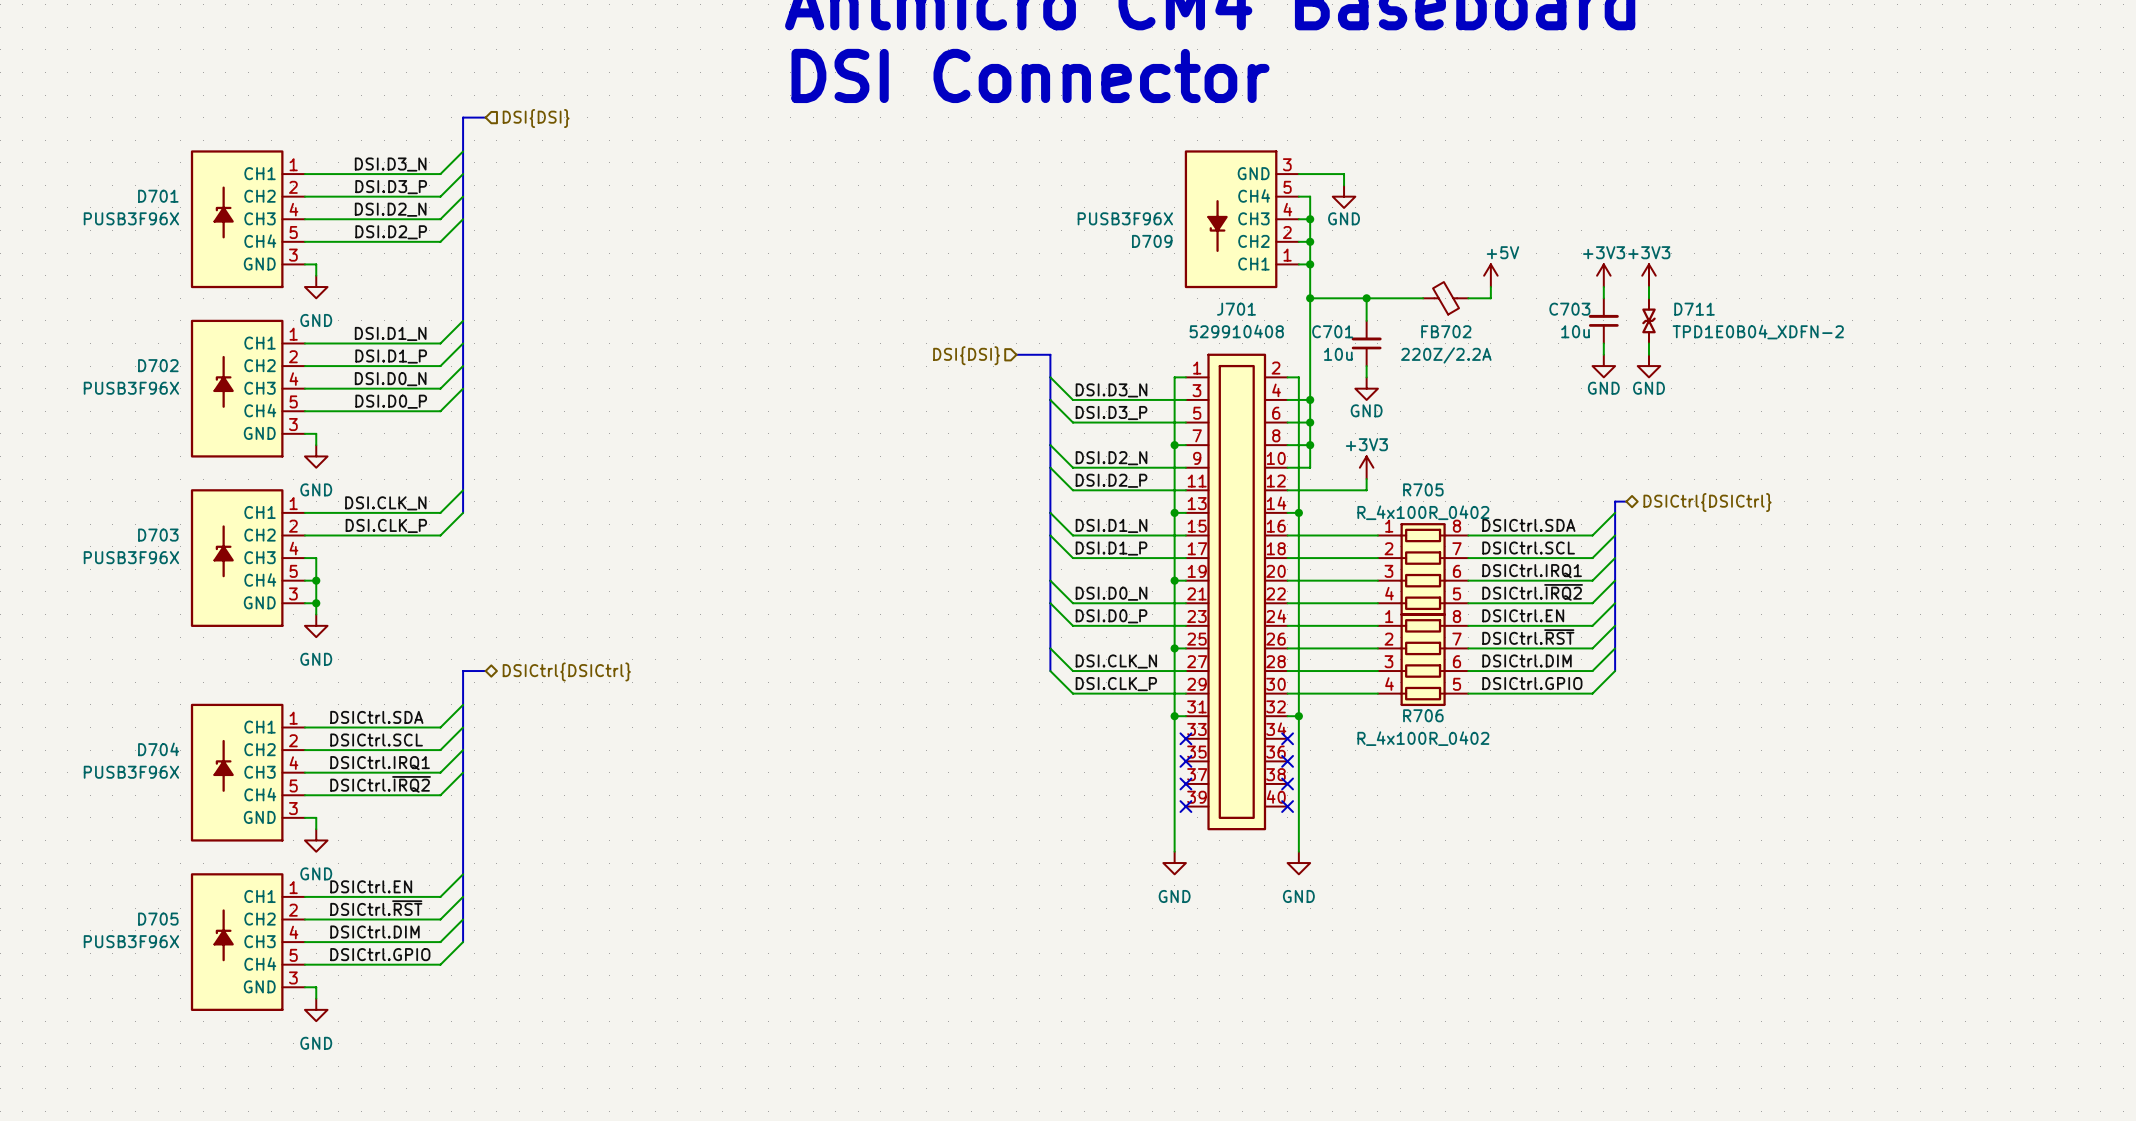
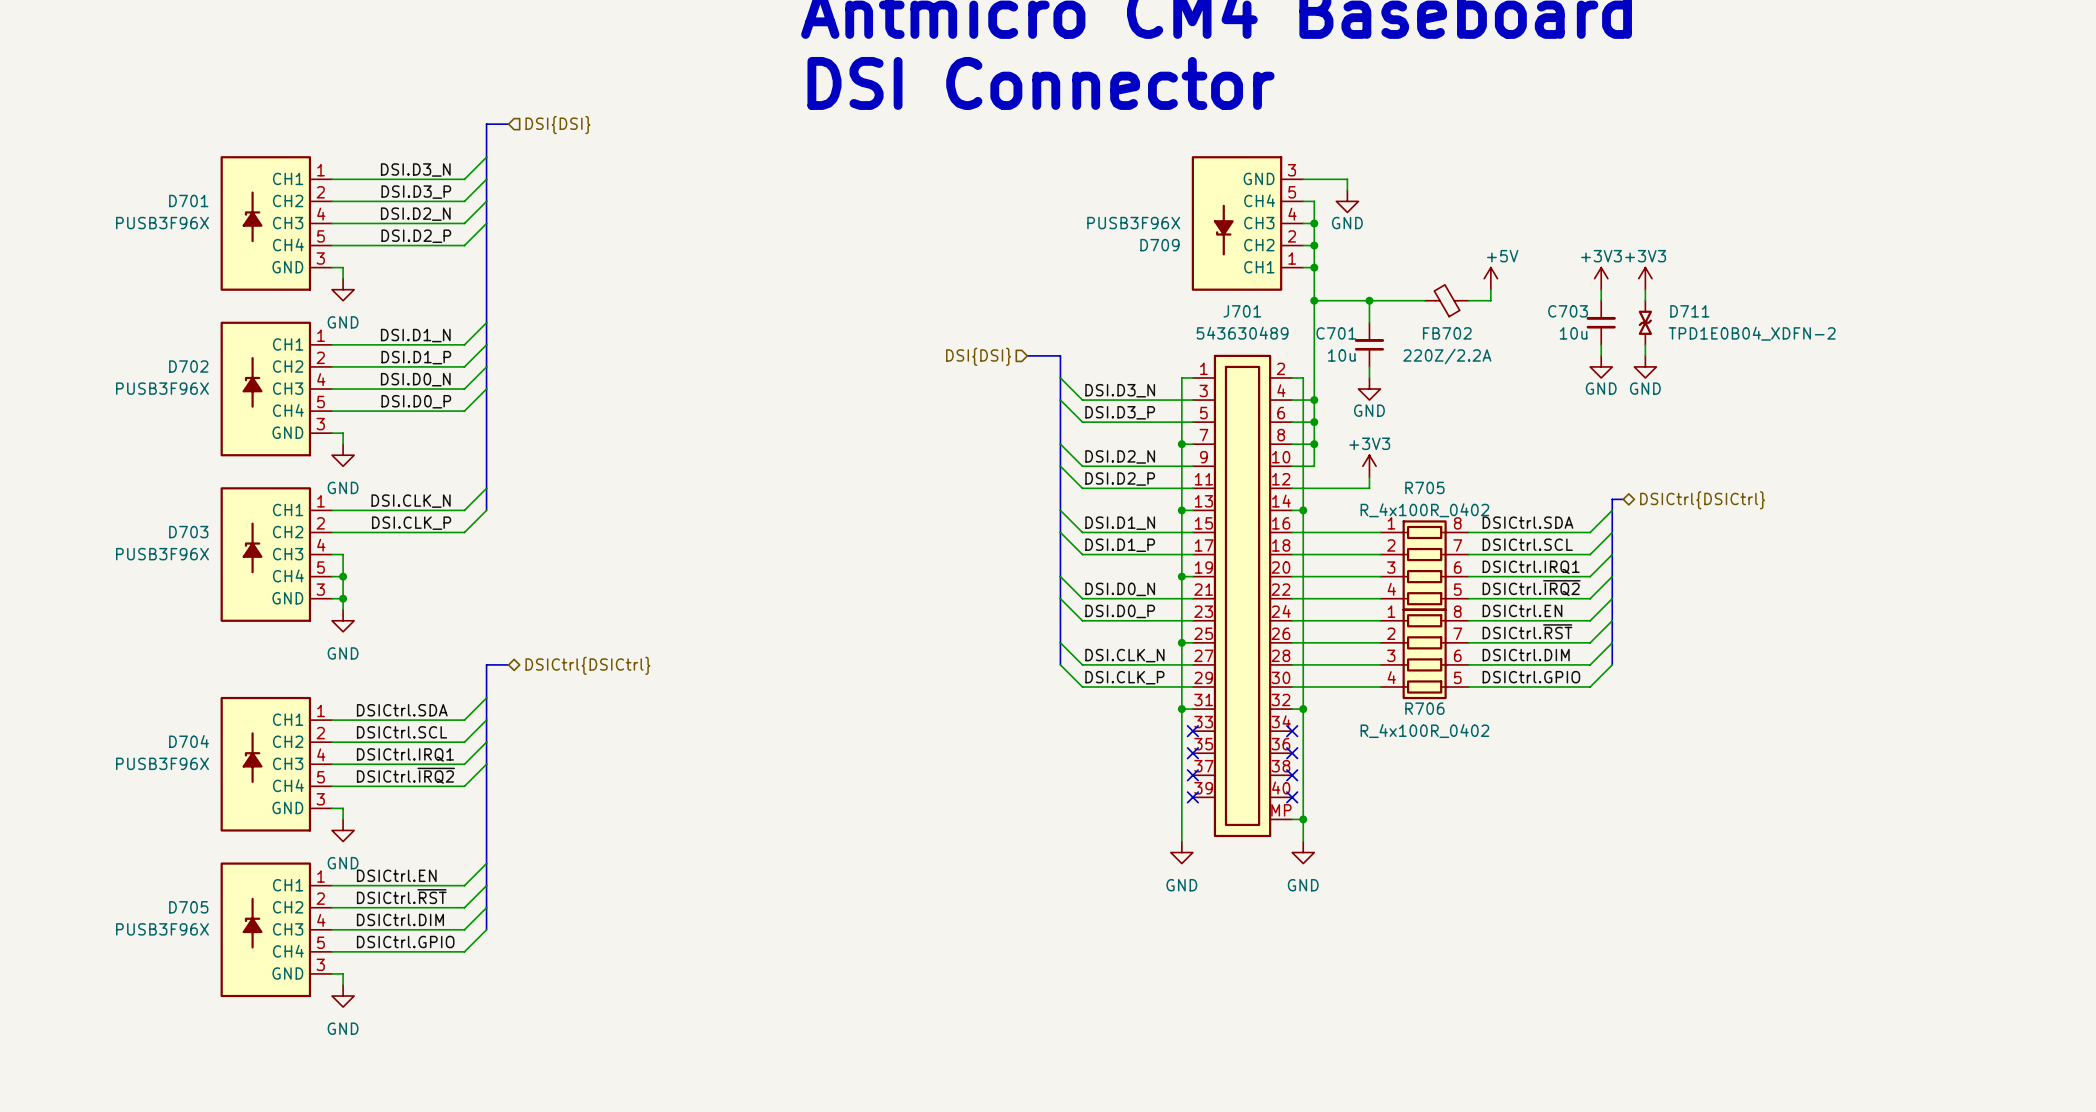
J701 text: 529910408 (1236, 331) -> 543630489 (1242, 333)
J701 symbol: [1185, 353, 1288, 831] -> [1192, 354, 1293, 838]
wire: none -> (1292, 819) (1303, 819)
junction: none -> (1303, 819)

